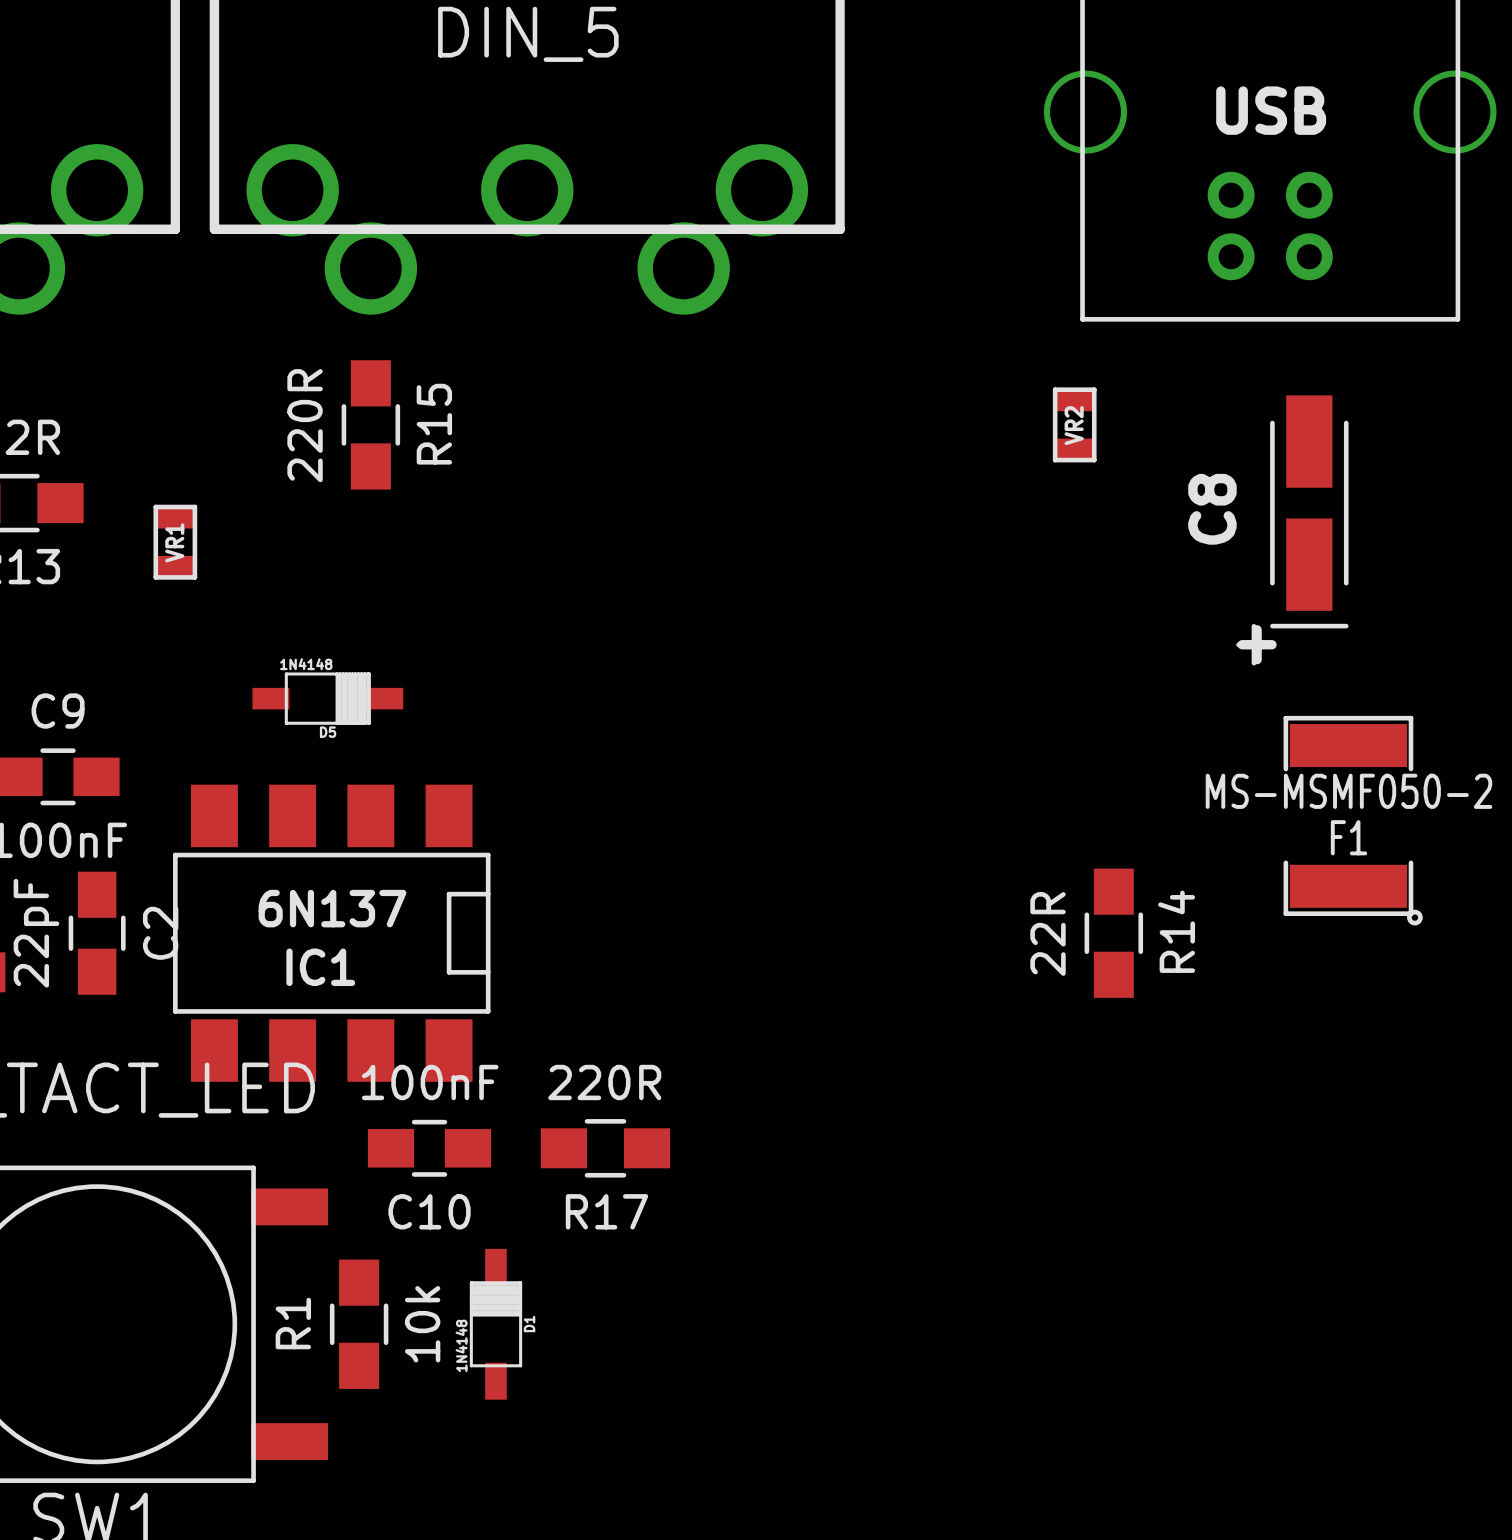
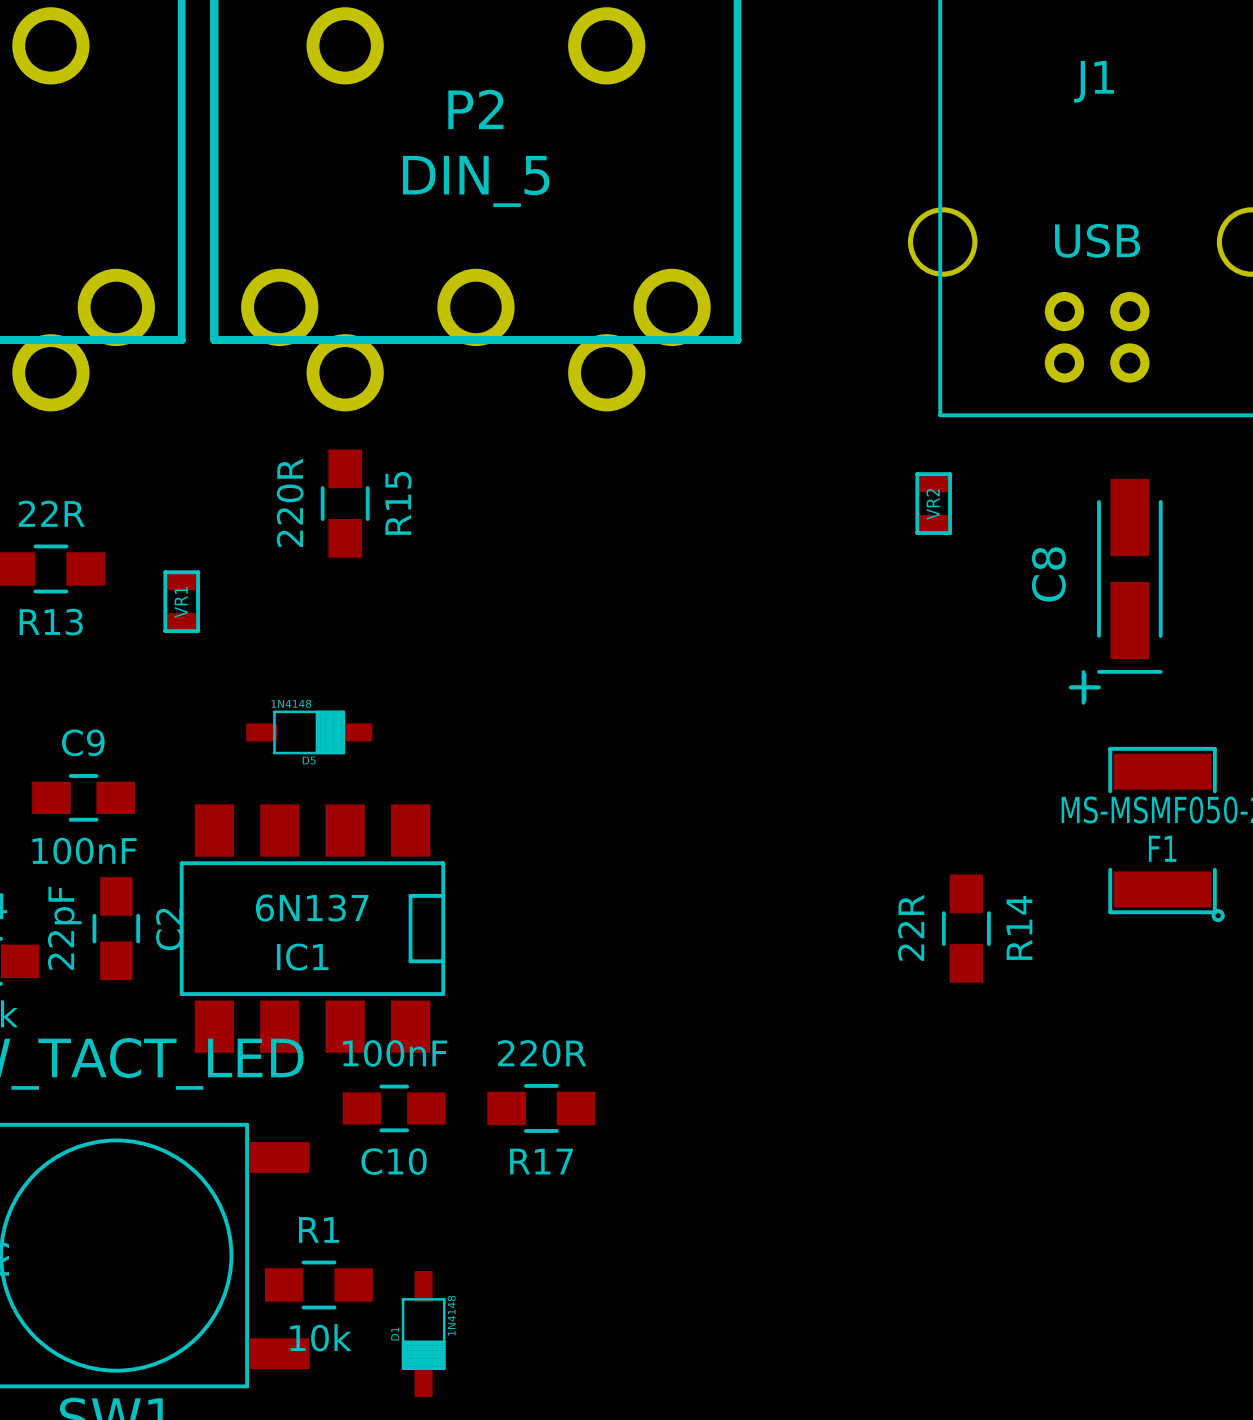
R1 rotation: 0° (359, 1324) -> 90° clockwise (319, 1285)
D1 rotation: 0° (495, 1324) -> 180° (423, 1334)
D1 position: (495, 1324) -> (423, 1334)

